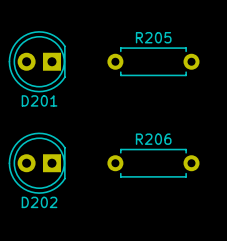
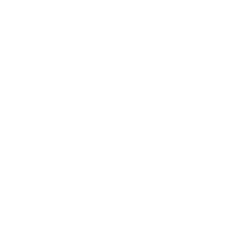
D201: (37, 61) -> none
R205: (153, 61) -> none
D202: (37, 163) -> none
R206: (153, 163) -> none

